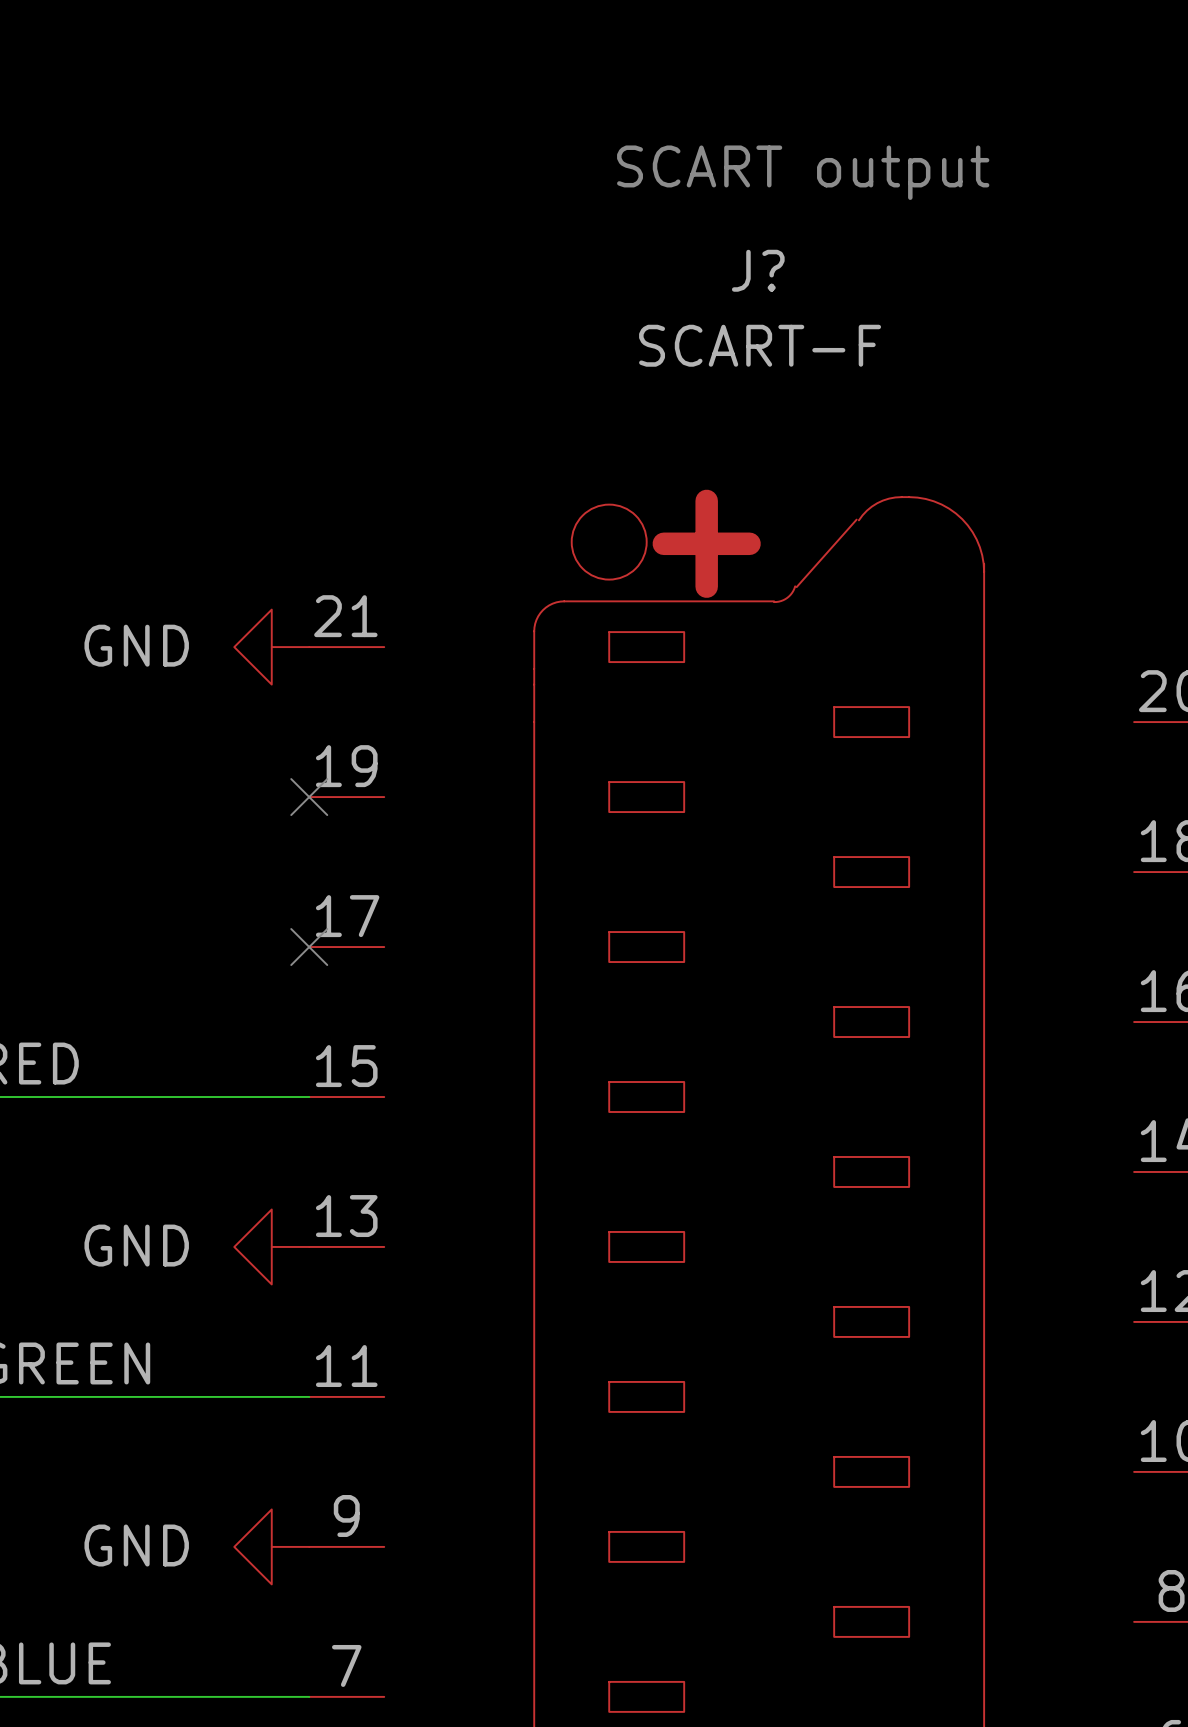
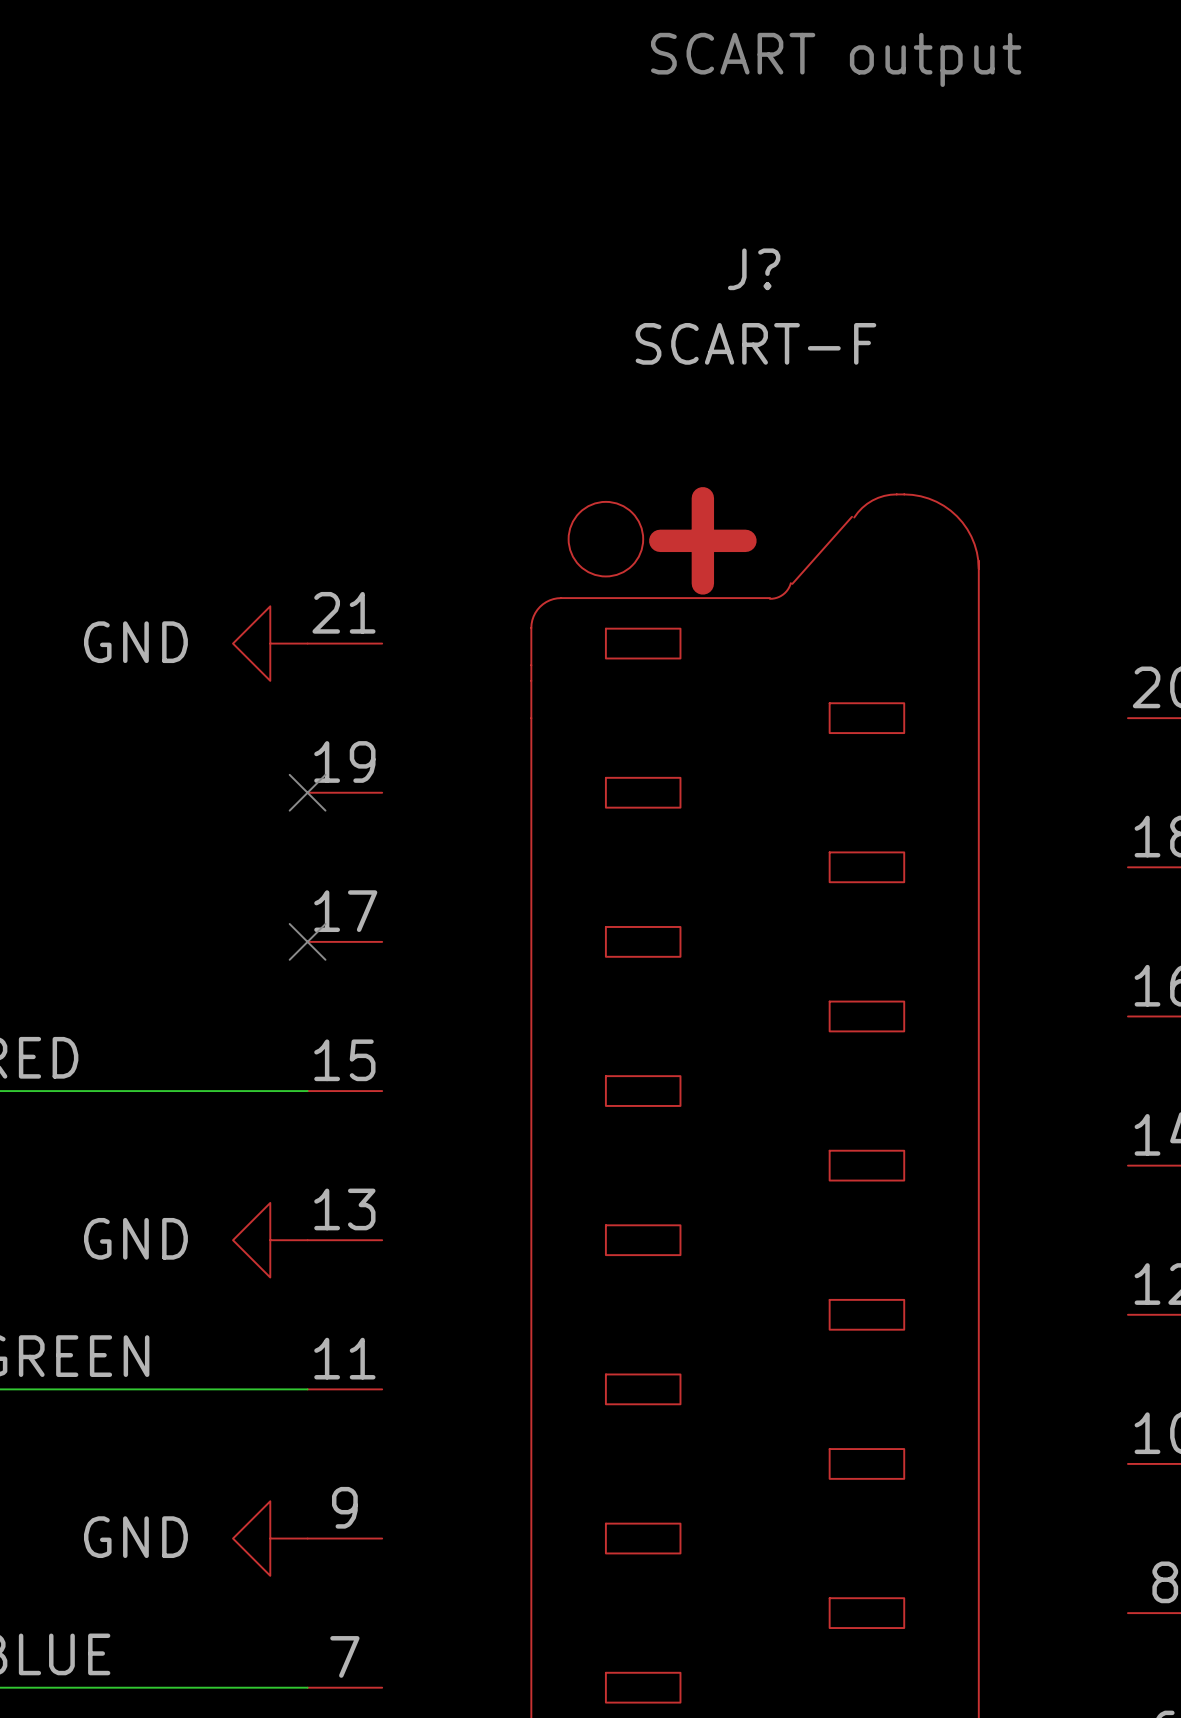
text position: SCART output (803, 172) -> SCART output (836, 59)

